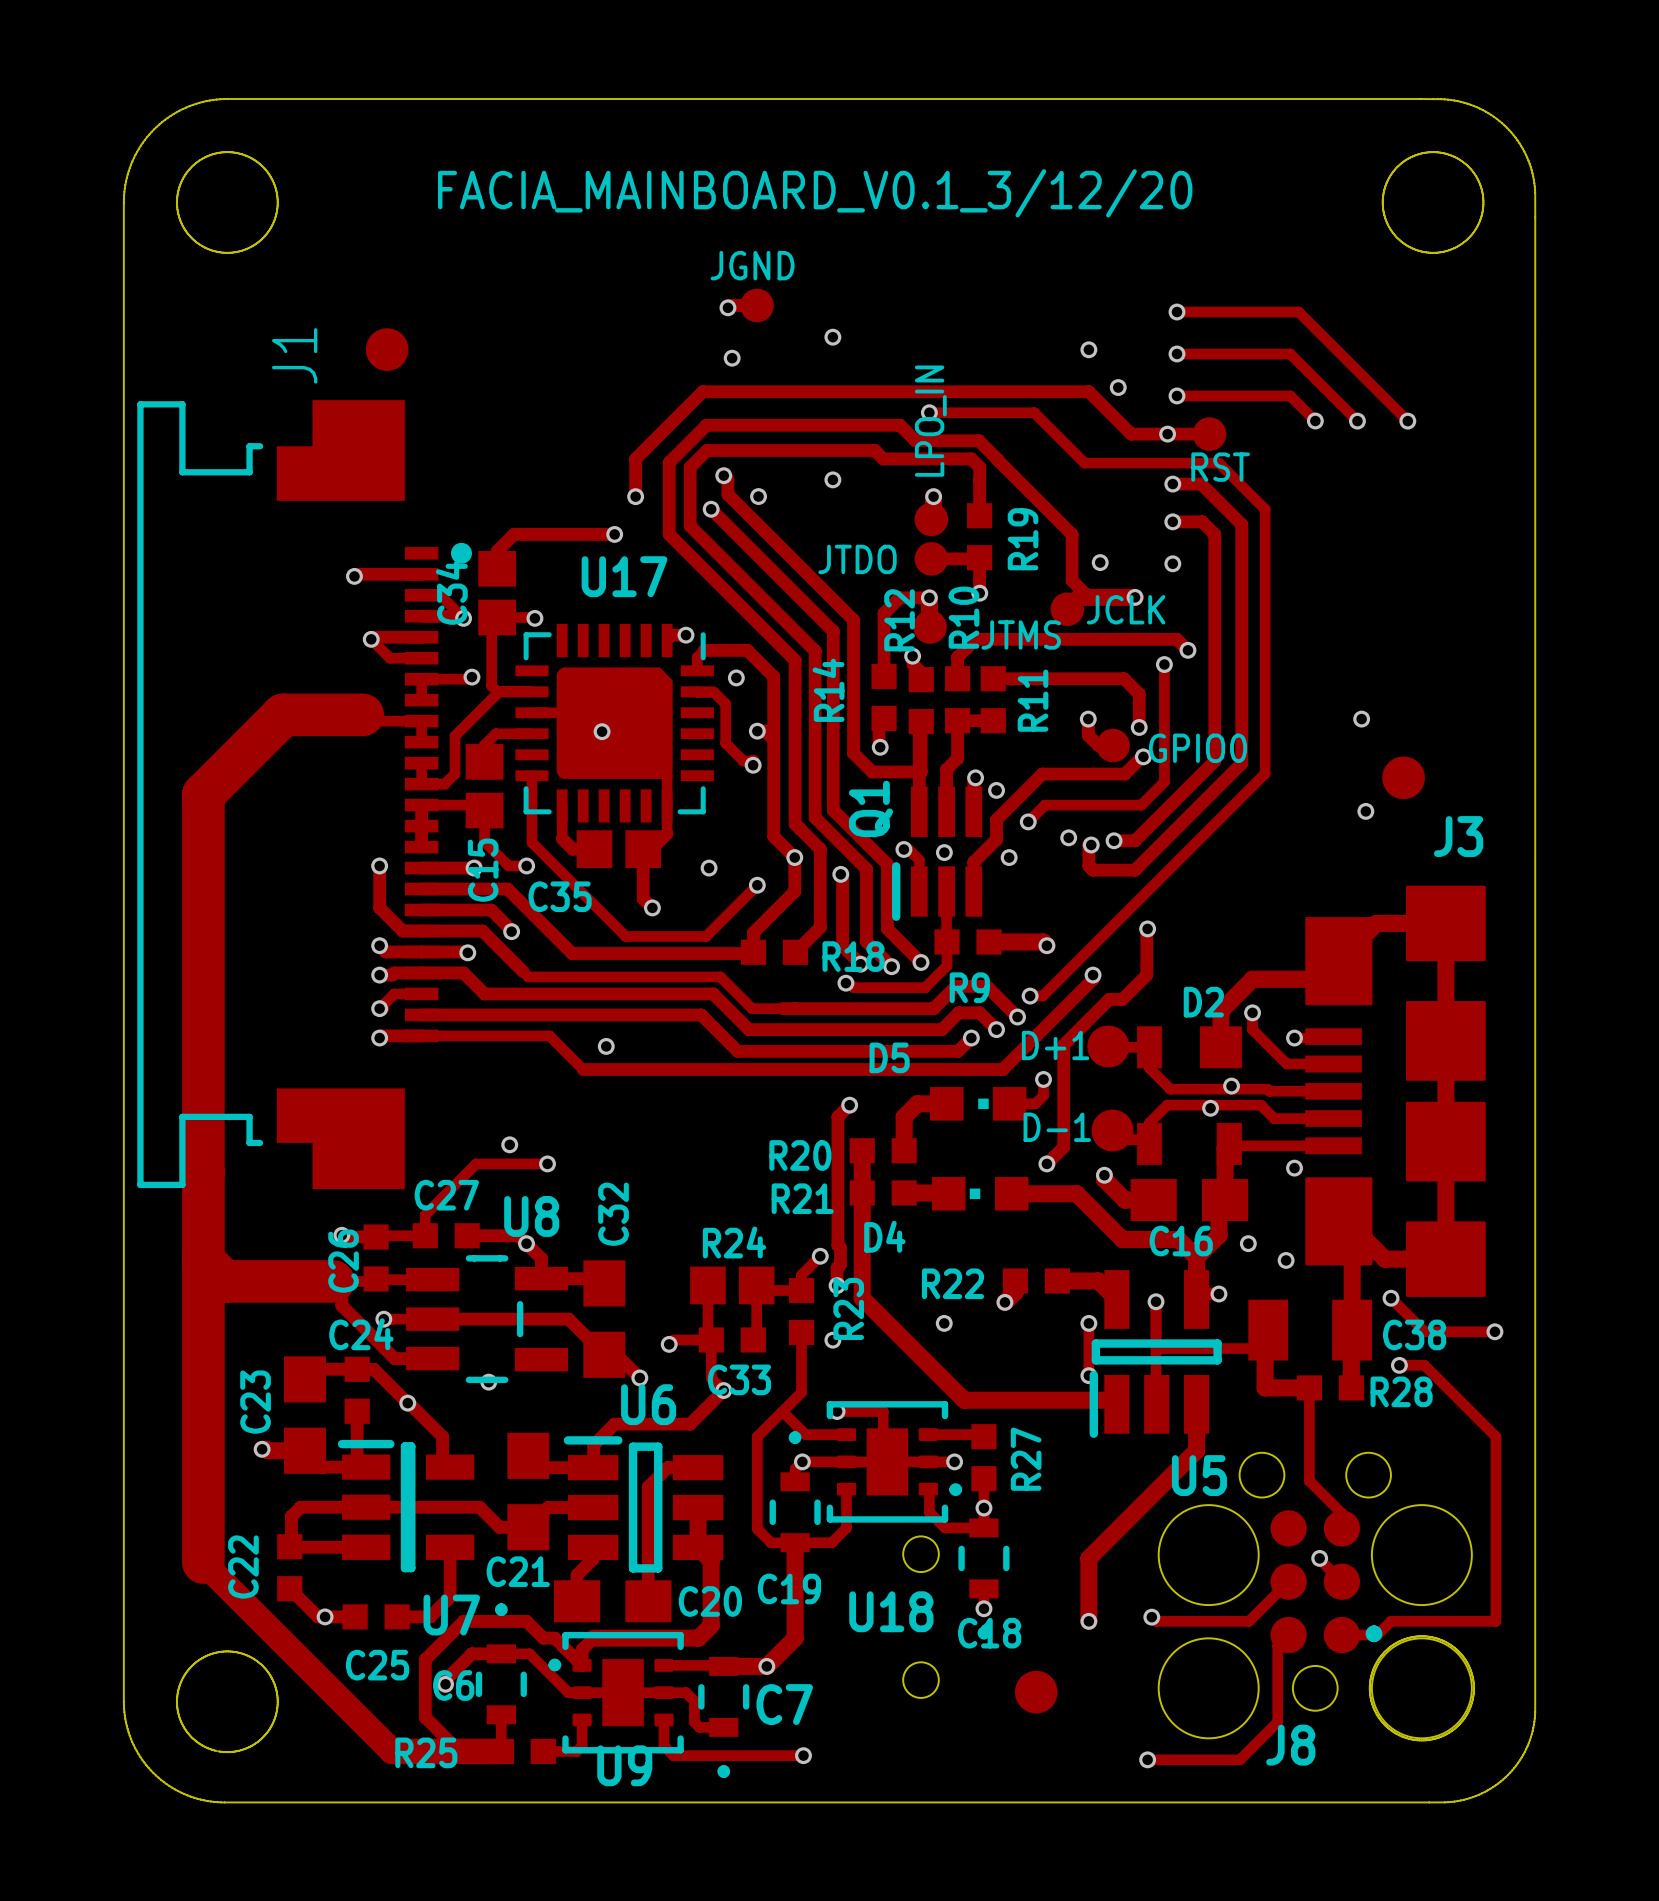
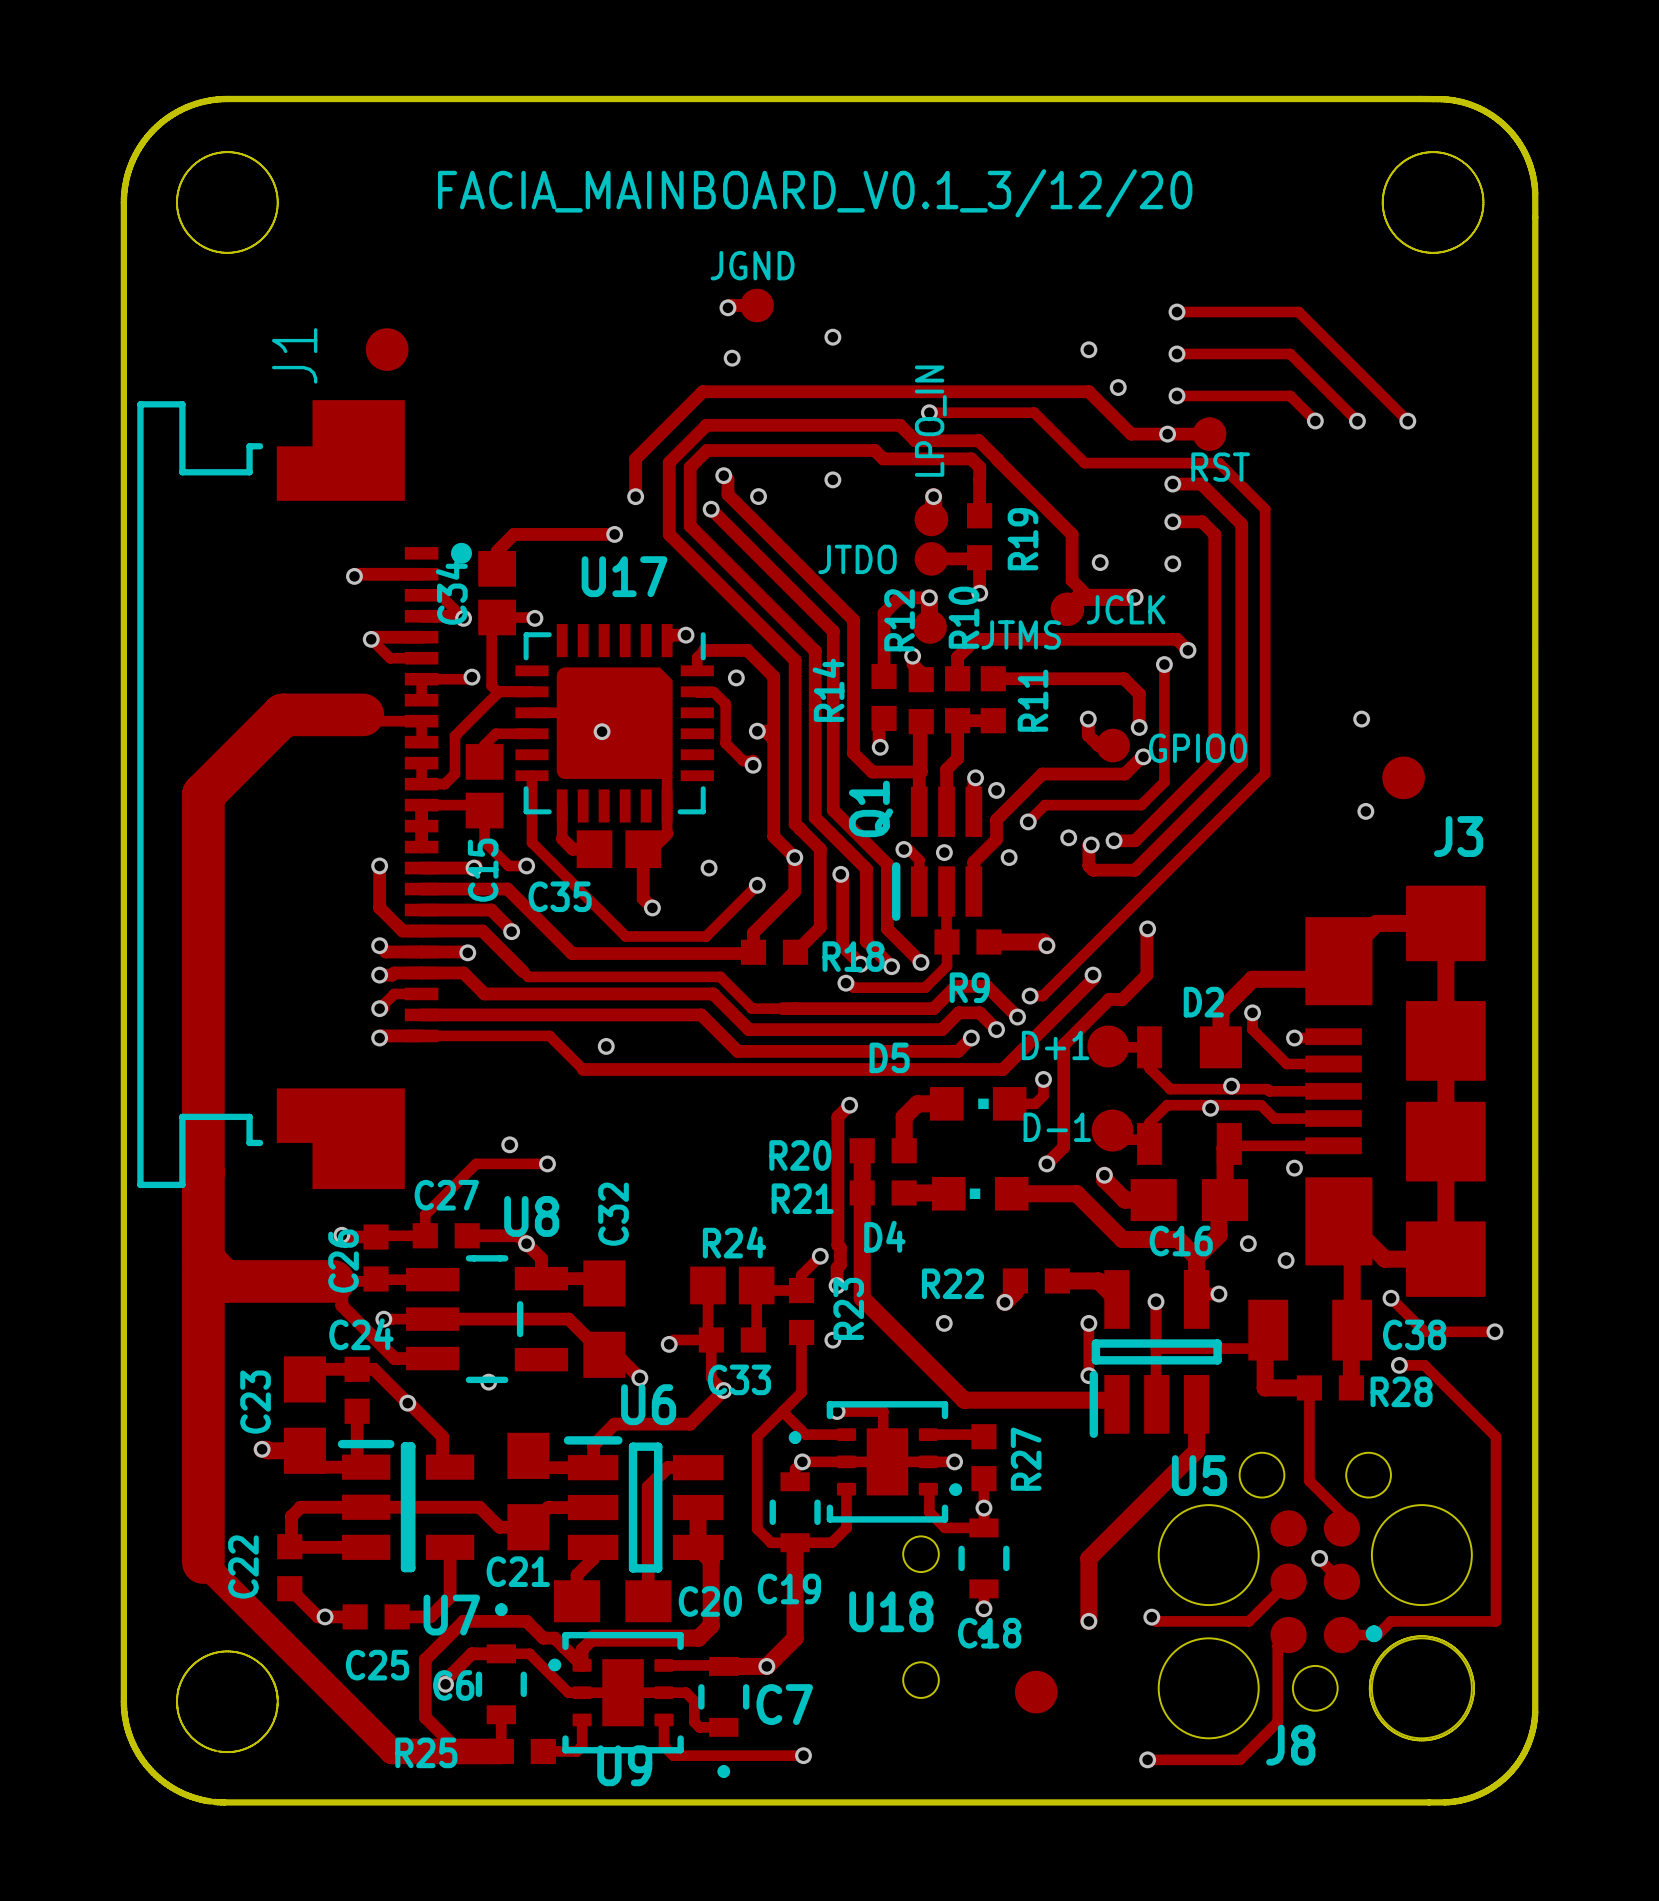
board edge width: thin (210, 1801) (190, 1796) (175, 1789) (148, 1767) (130, 1738) (123, 1705) (123, 202) (125, 184) (129, 167) (144, 139) (162, 122) (182, 109) (202, 101) (227, 98) (1437, 99) (1470, 104) (1496, 118) (1513, 135) (1524, 151) (1532, 173) (1535, 193) (1535, 1712) (1529, 1740) (1516, 1765) (1500, 1781) (1484, 1791) (1466, 1798) (1444, 1802) (214, 1801) -> thick (210, 1801) (190, 1796) (175, 1789) (148, 1767) (130, 1738) (123, 1705) (123, 202) (125, 184) (129, 167) (144, 139) (162, 122) (182, 109) (202, 101) (227, 98) (1437, 99) (1470, 104) (1496, 118) (1513, 135) (1524, 151) (1532, 173) (1535, 193) (1535, 1712) (1529, 1740) (1516, 1765) (1500, 1781) (1484, 1791) (1466, 1798) (1444, 1802) (214, 1801)

